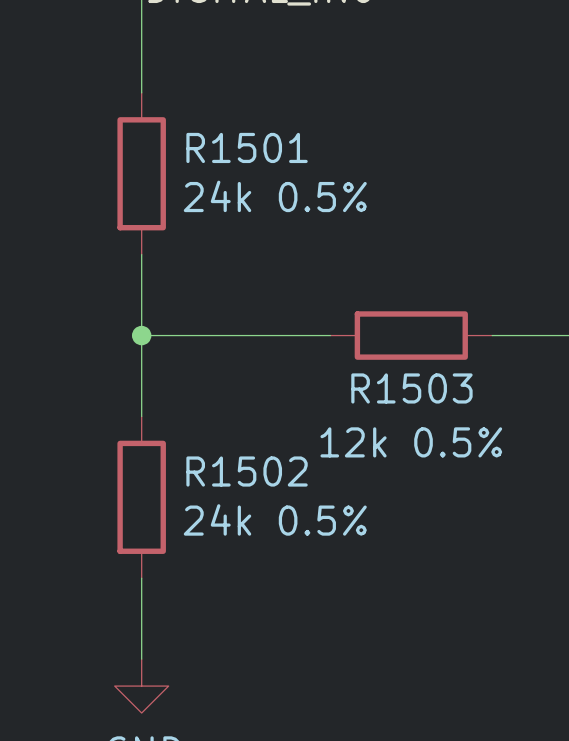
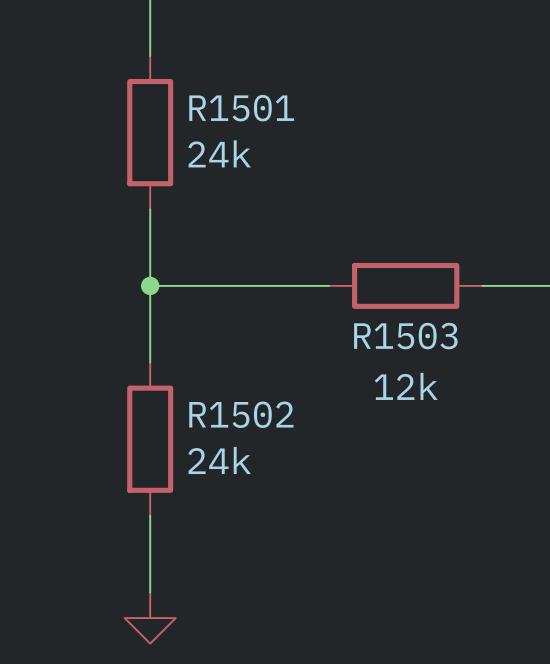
R1501 value: 24k 0.5% (275, 196) -> 24k (219, 153)
R1503 value: 12k 0.5% (411, 442) -> 12k (406, 386)
R1502 value: 24k 0.5% (275, 519) -> 24k (219, 460)

